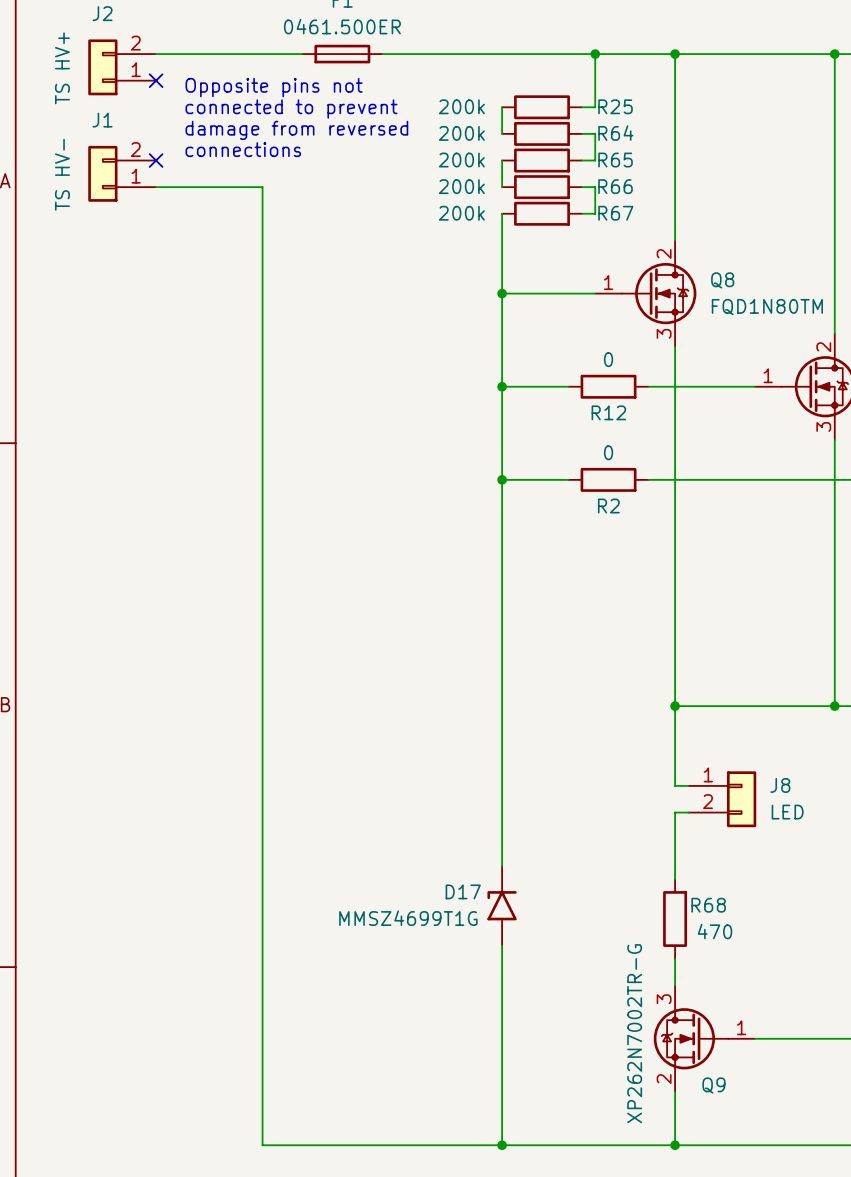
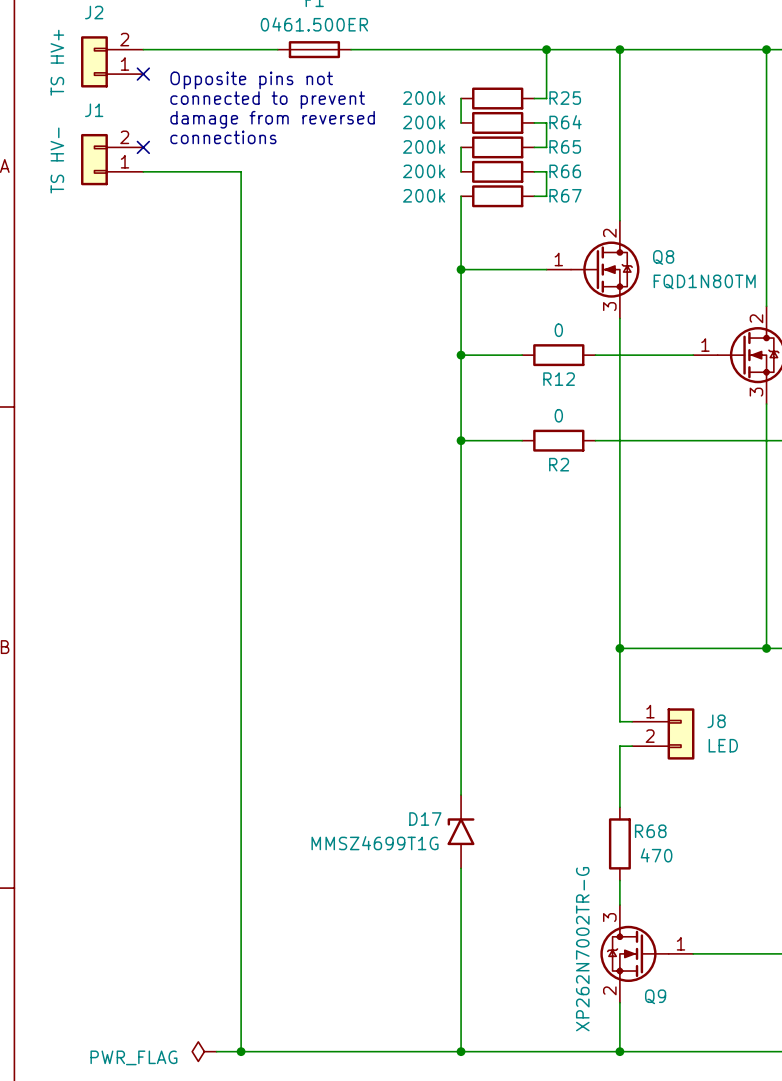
power symbol: none -> PWR_FLAG (204, 1051)
wire: none -> (216, 1051) (241, 1051)
junction: none -> (241, 1051)

